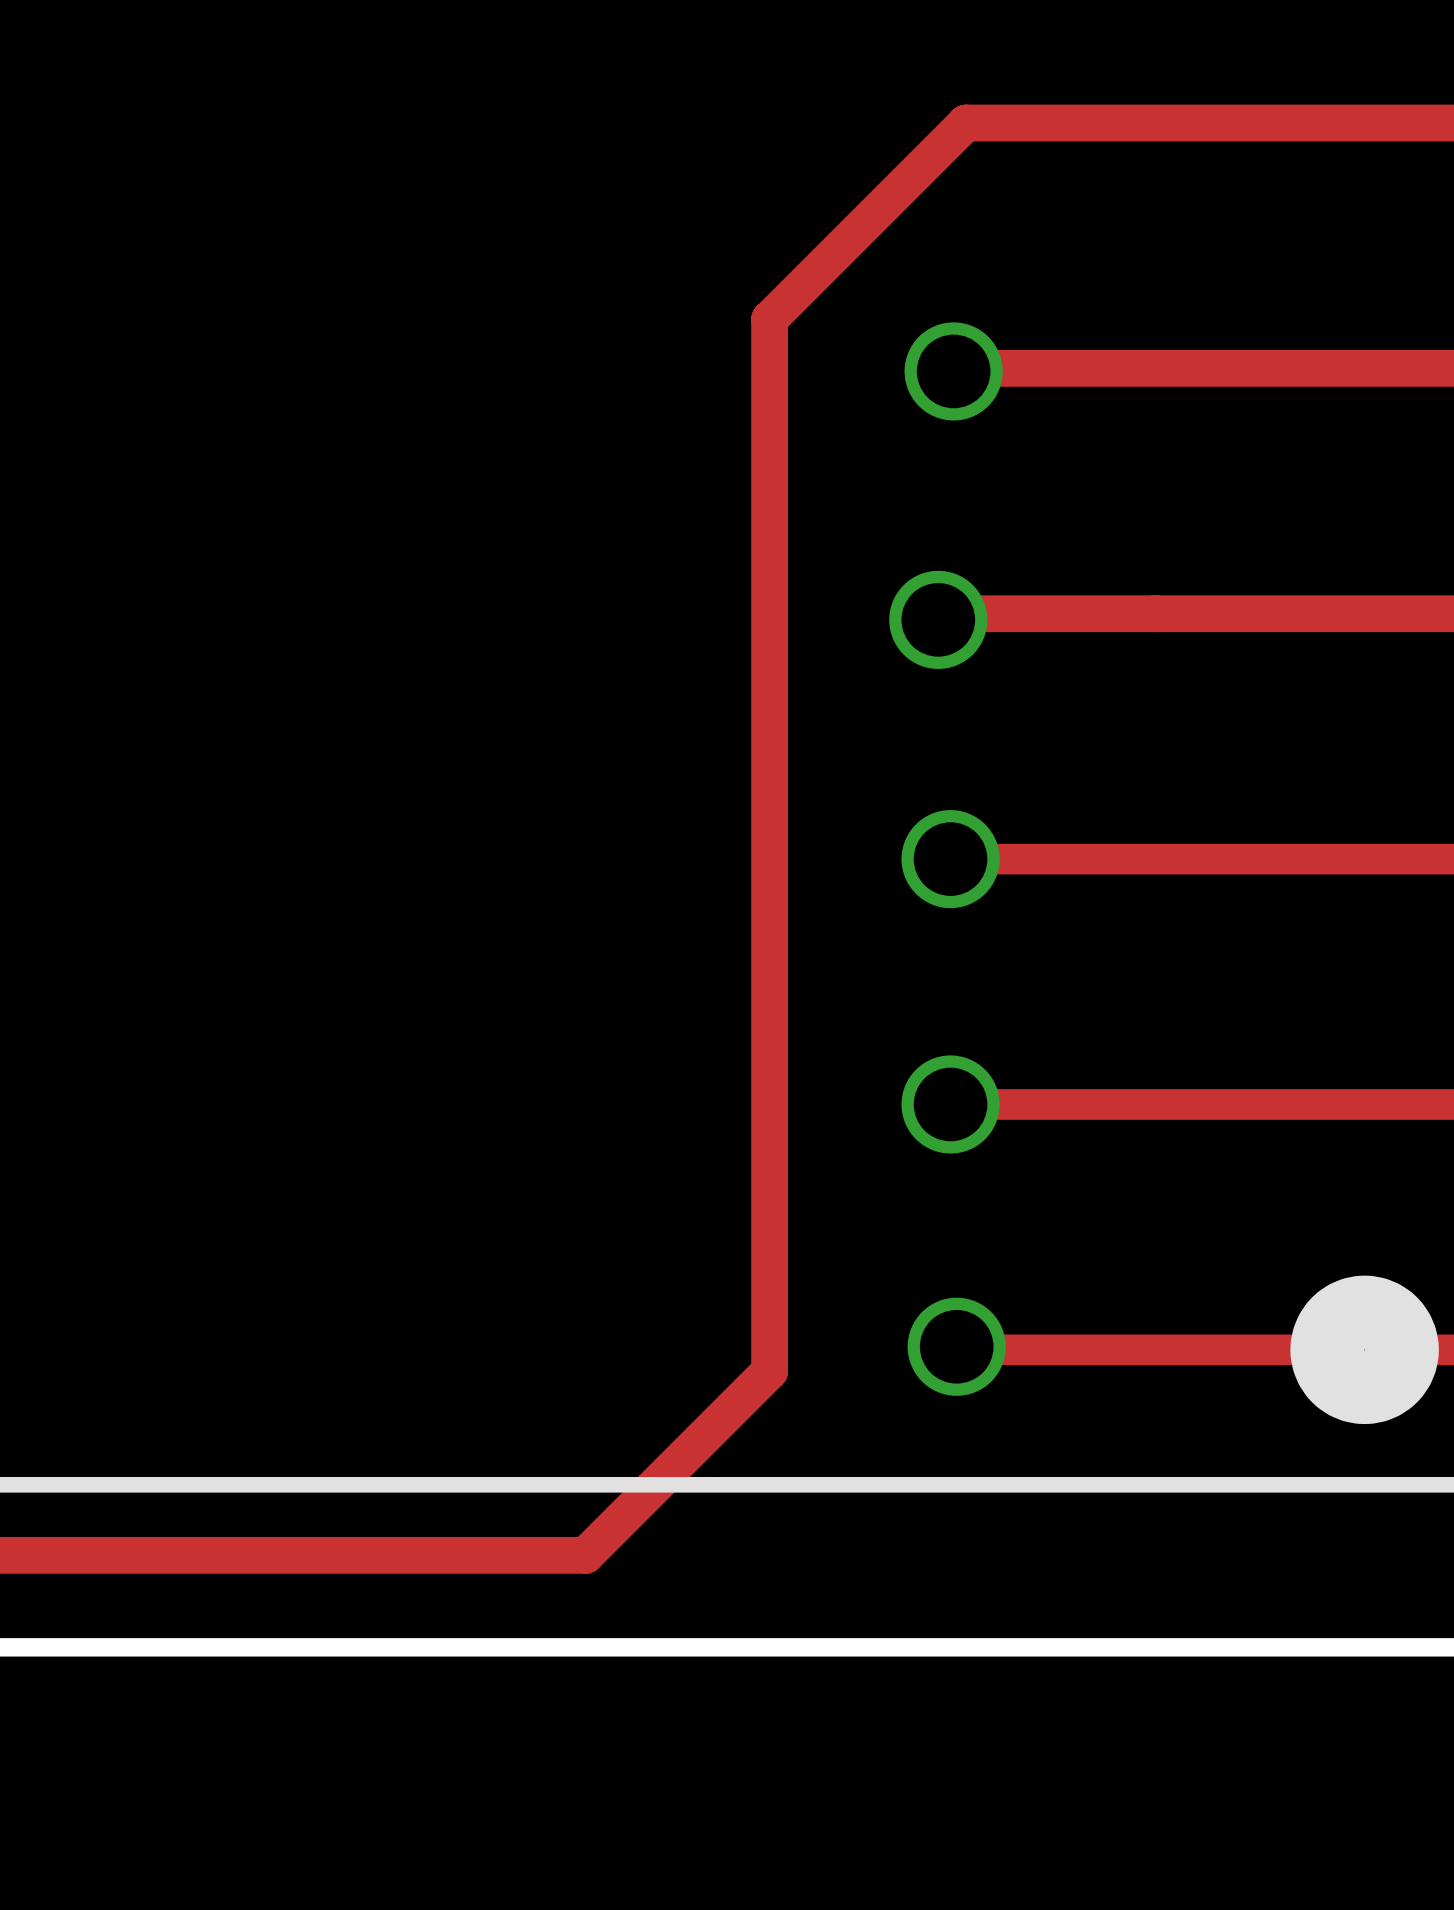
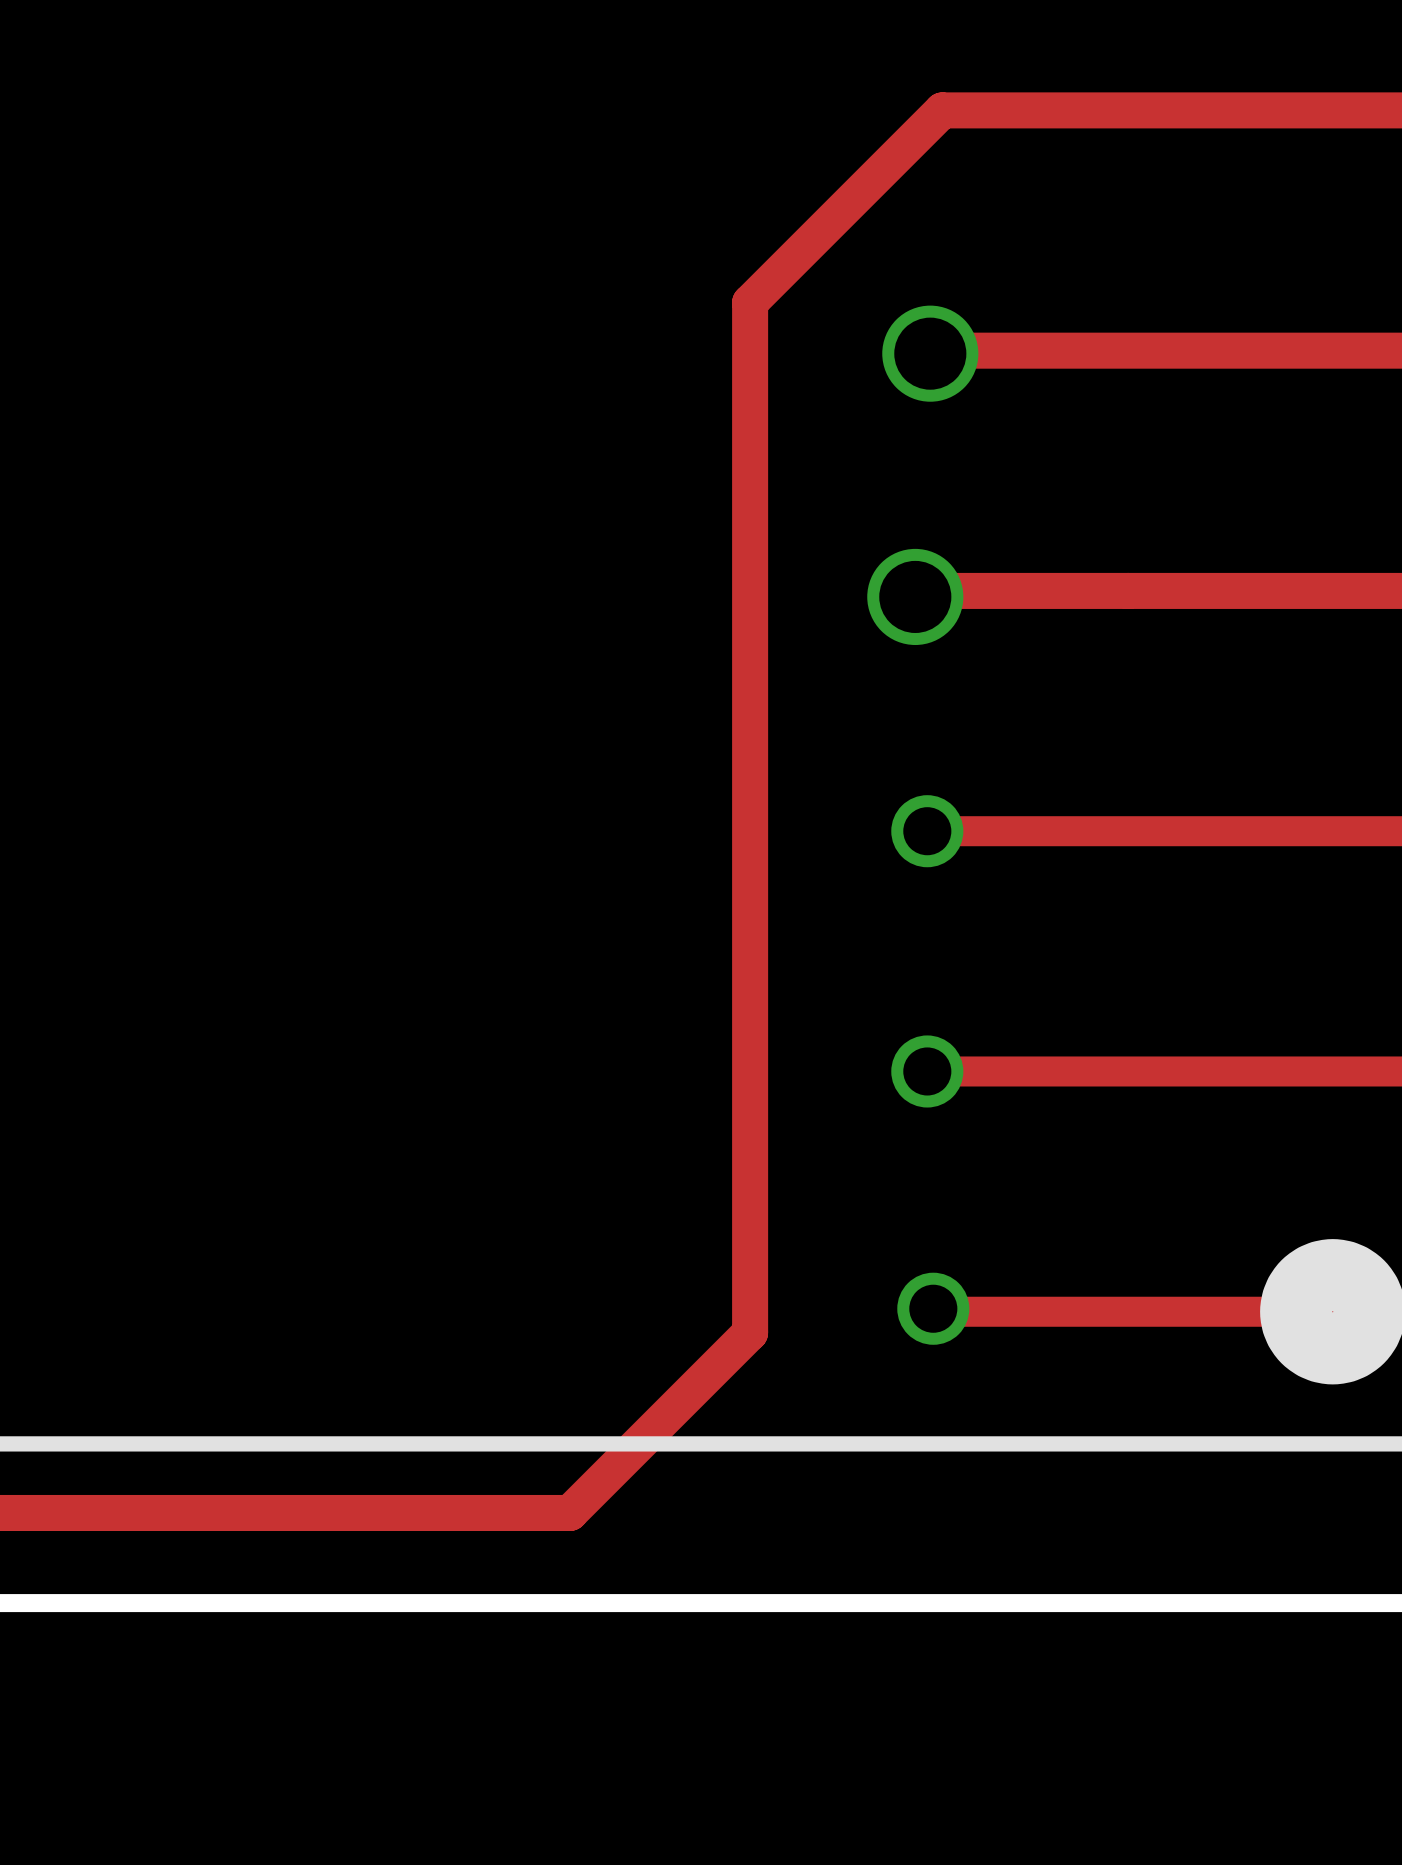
via size: [901, 810, 1000, 909] -> [891, 795, 964, 868]
via size: [901, 1055, 1000, 1154] -> [891, 1035, 964, 1108]
via size: [907, 1297, 1006, 1396] -> [897, 1272, 970, 1345]

